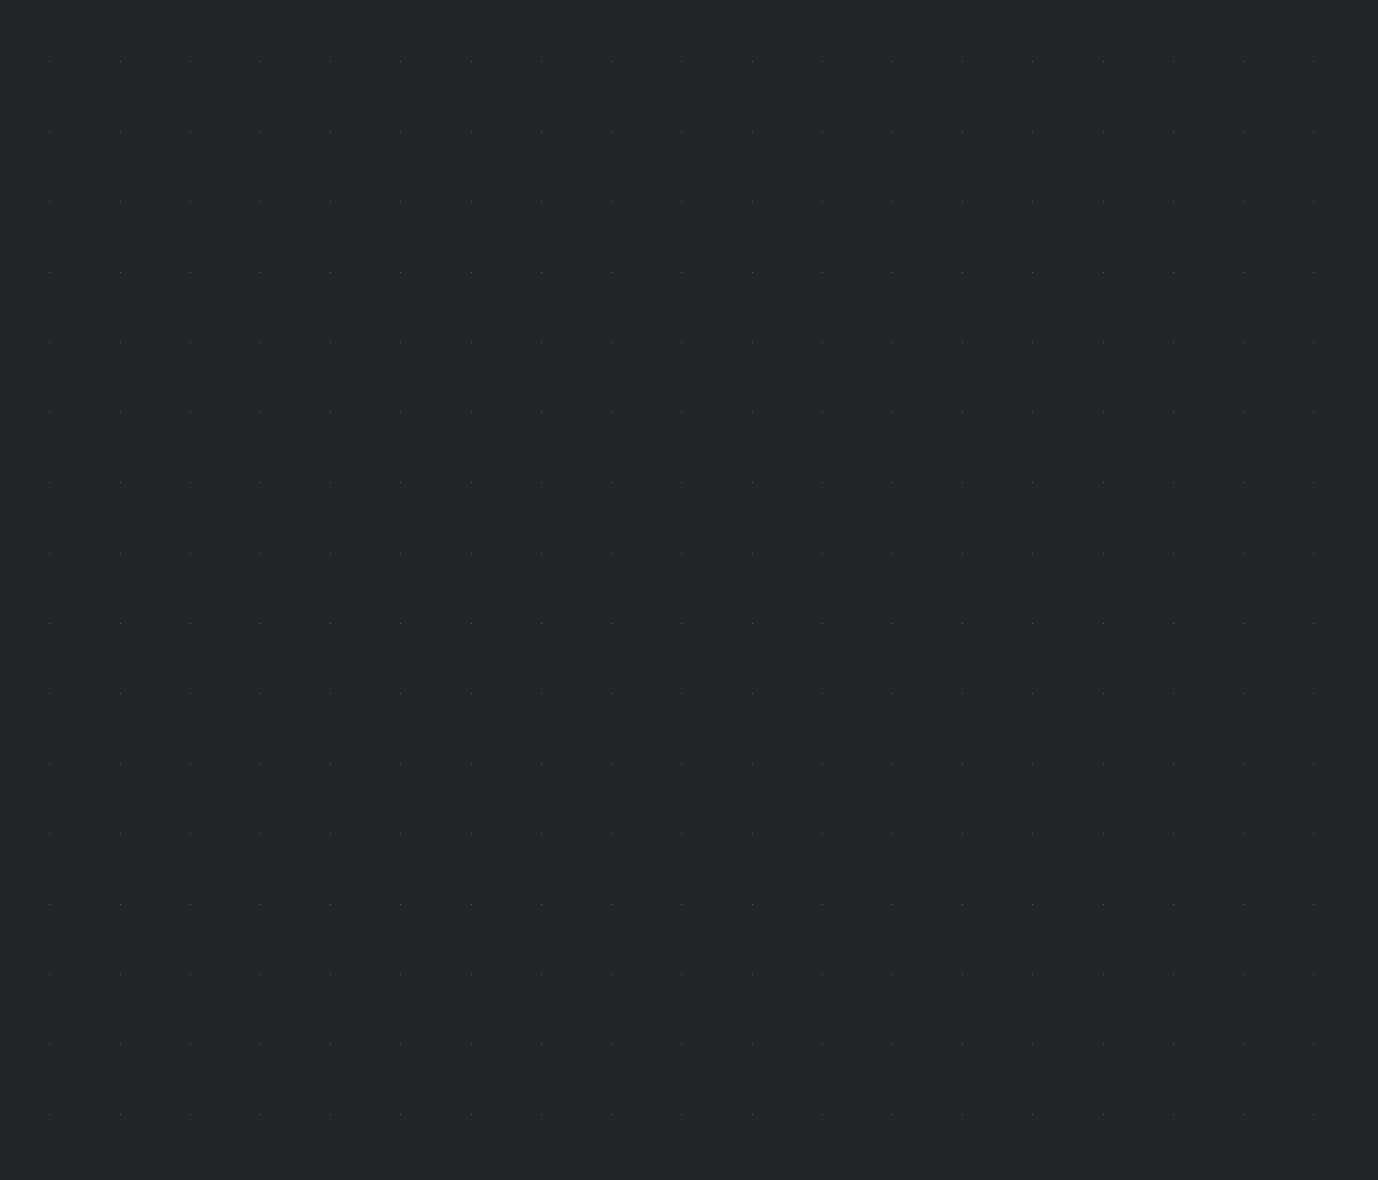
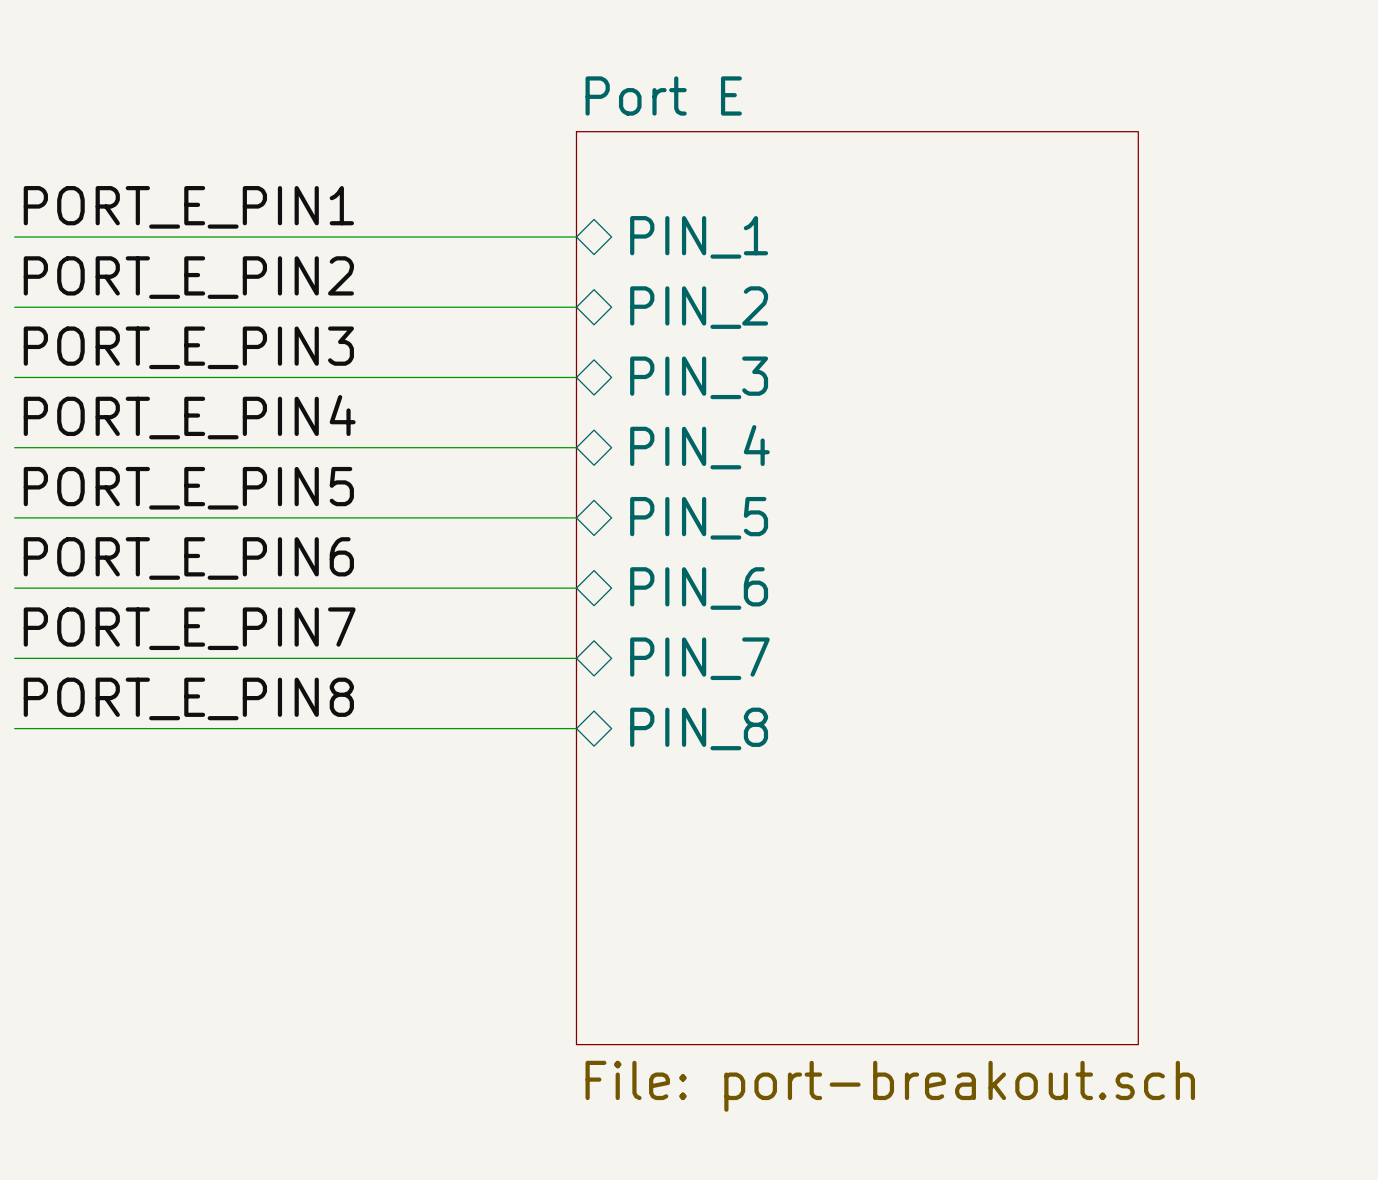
label: none -> PORT_E_PIN1 (188, 207)
wire: none -> (14, 237) (576, 237)
sheet pin: none -> PIN_1 (699, 237)
label: none -> PORT_E_PIN2 (188, 277)
wire: none -> (14, 307) (576, 307)
sheet pin: none -> PIN_2 (699, 307)
label: none -> PORT_E_PIN3 (188, 347)
wire: none -> (14, 377) (576, 377)
sheet pin: none -> PIN_3 (699, 377)
label: none -> PORT_E_PIN4 (189, 417)
wire: none -> (14, 447) (576, 447)
sheet pin: none -> PIN_4 (699, 447)
label: none -> PORT_E_PIN5 (188, 488)
wire: none -> (14, 517) (576, 517)
sheet pin: none -> PIN_5 (699, 518)
label: none -> PORT_E_PIN6 (188, 558)
wire: none -> (14, 588) (576, 588)
sheet Port E: none -> File: port-breakout.sch (857, 588)
sheet pin: none -> PIN_6 (699, 588)
label: none -> PORT_E_PIN7 (189, 628)
wire: none -> (14, 658) (576, 658)
sheet pin: none -> PIN_7 (699, 658)
label: none -> PORT_E_PIN8 (188, 698)
wire: none -> (14, 728) (576, 728)
sheet pin: none -> PIN_8 (699, 728)

